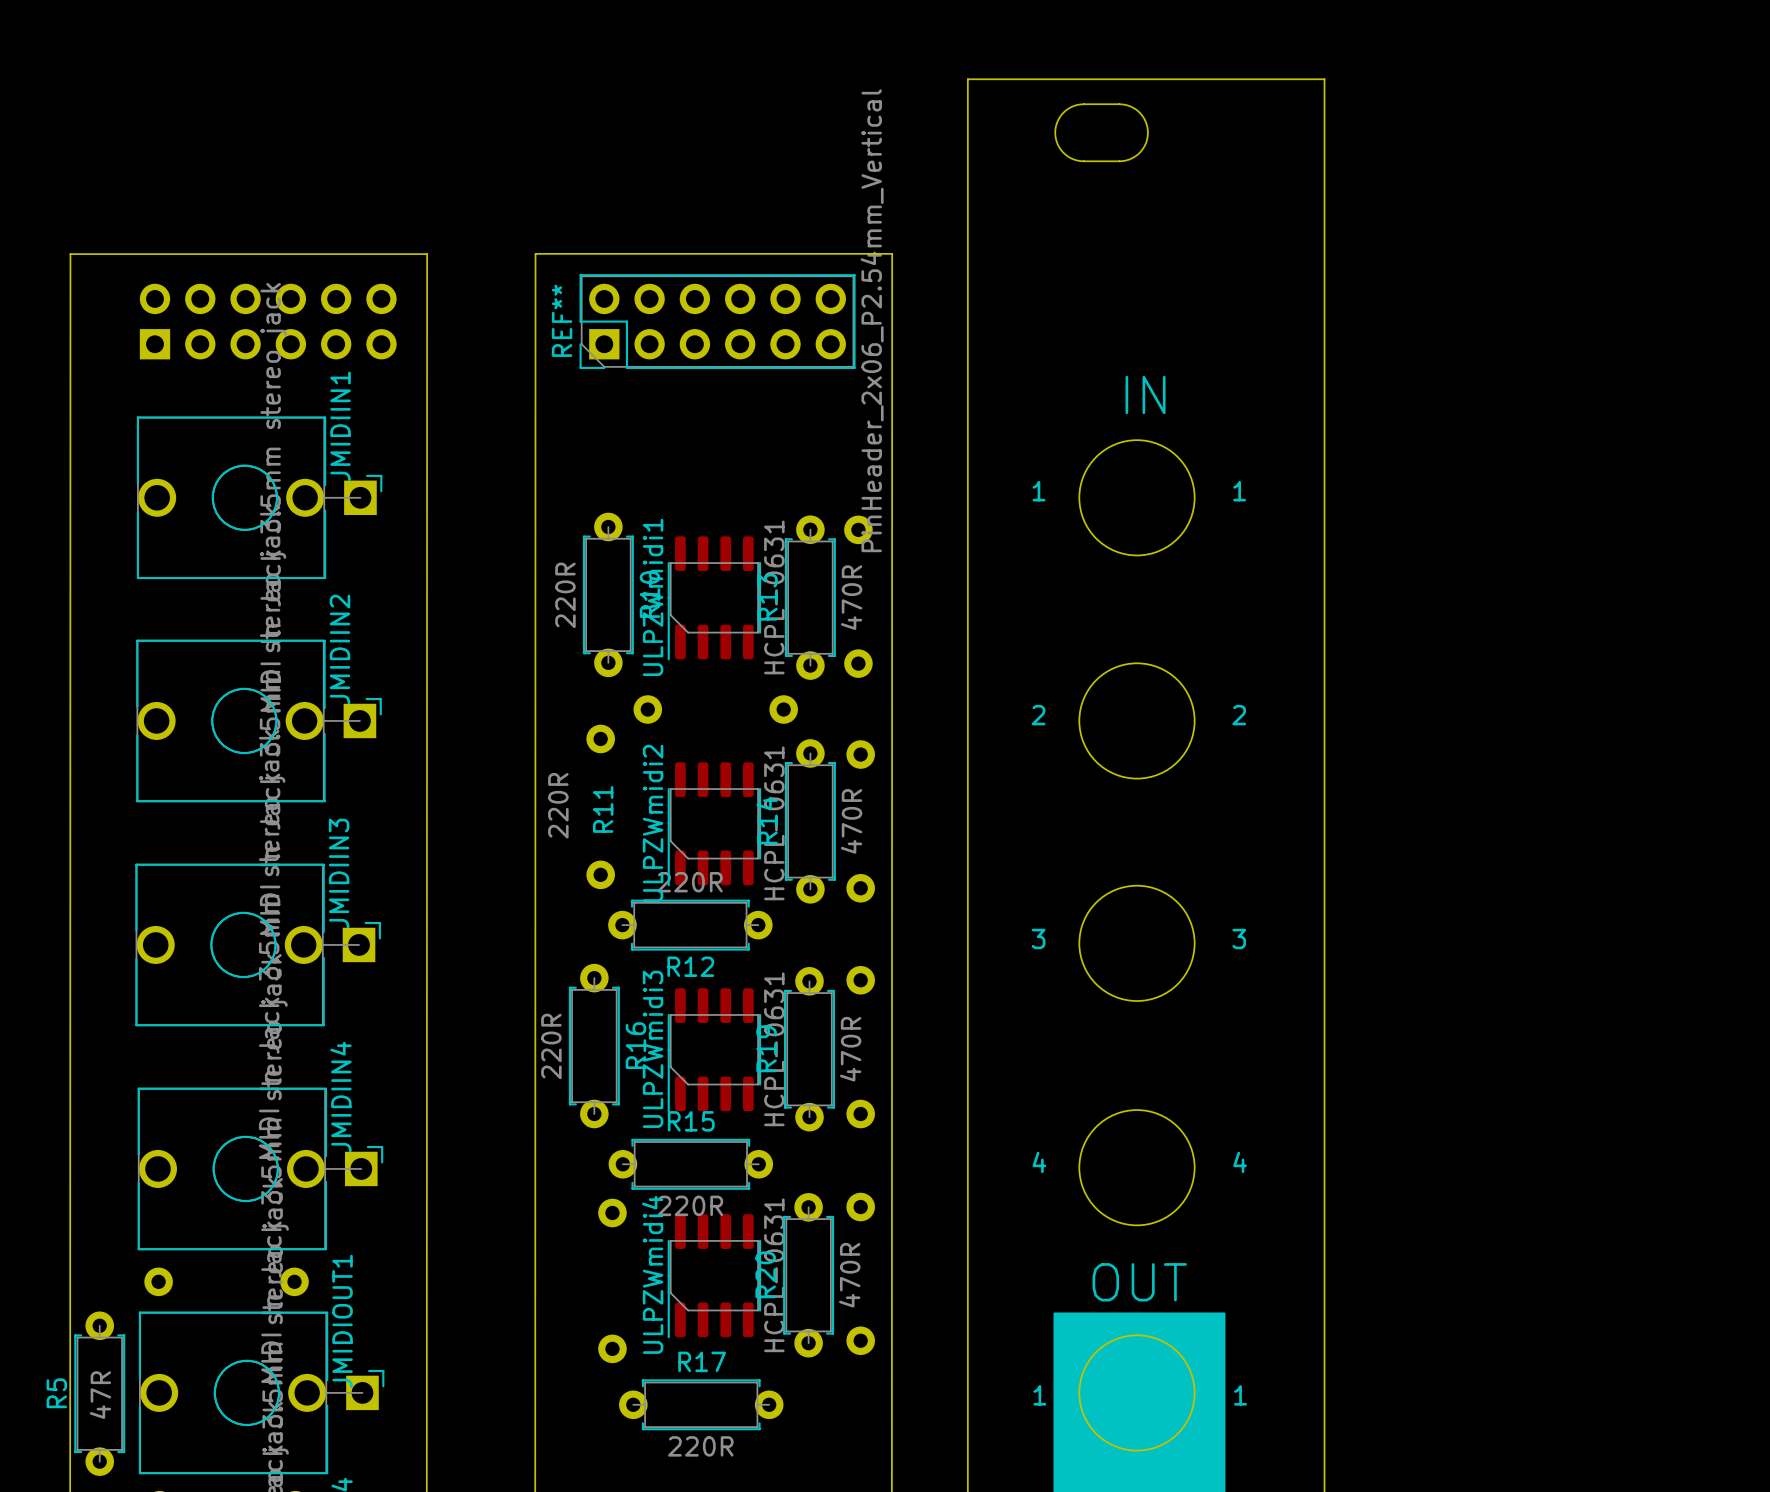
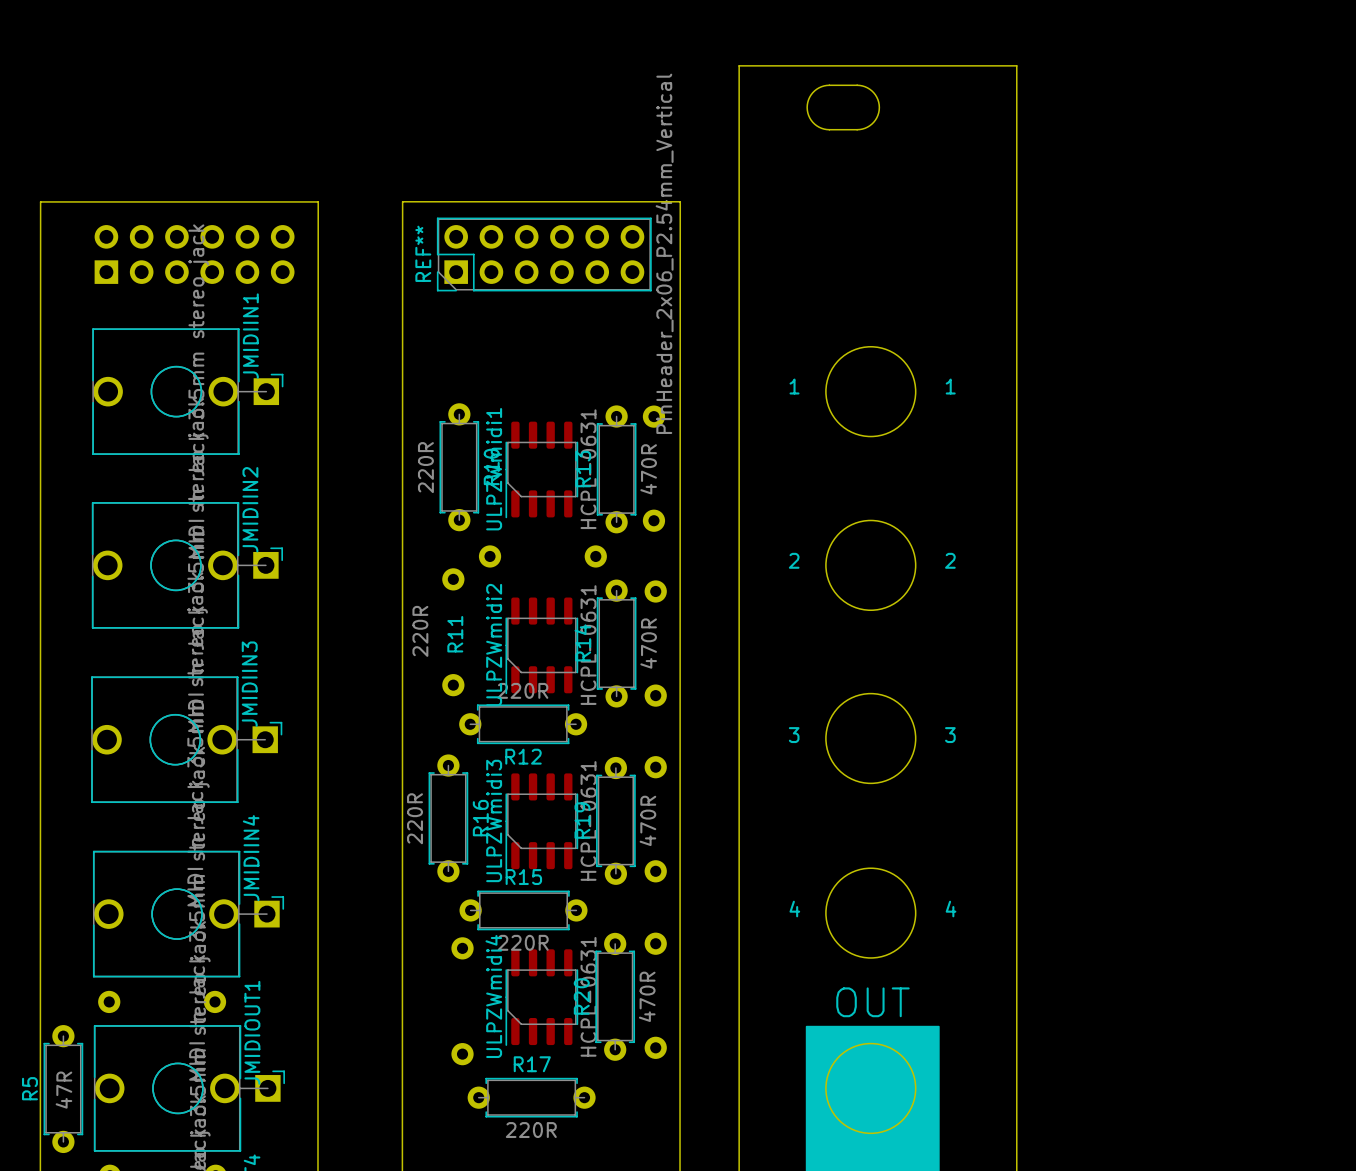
text: IN (1145, 394) -> none
text: 1 (1039, 1395) -> none
text: 1 (1240, 1395) -> none

